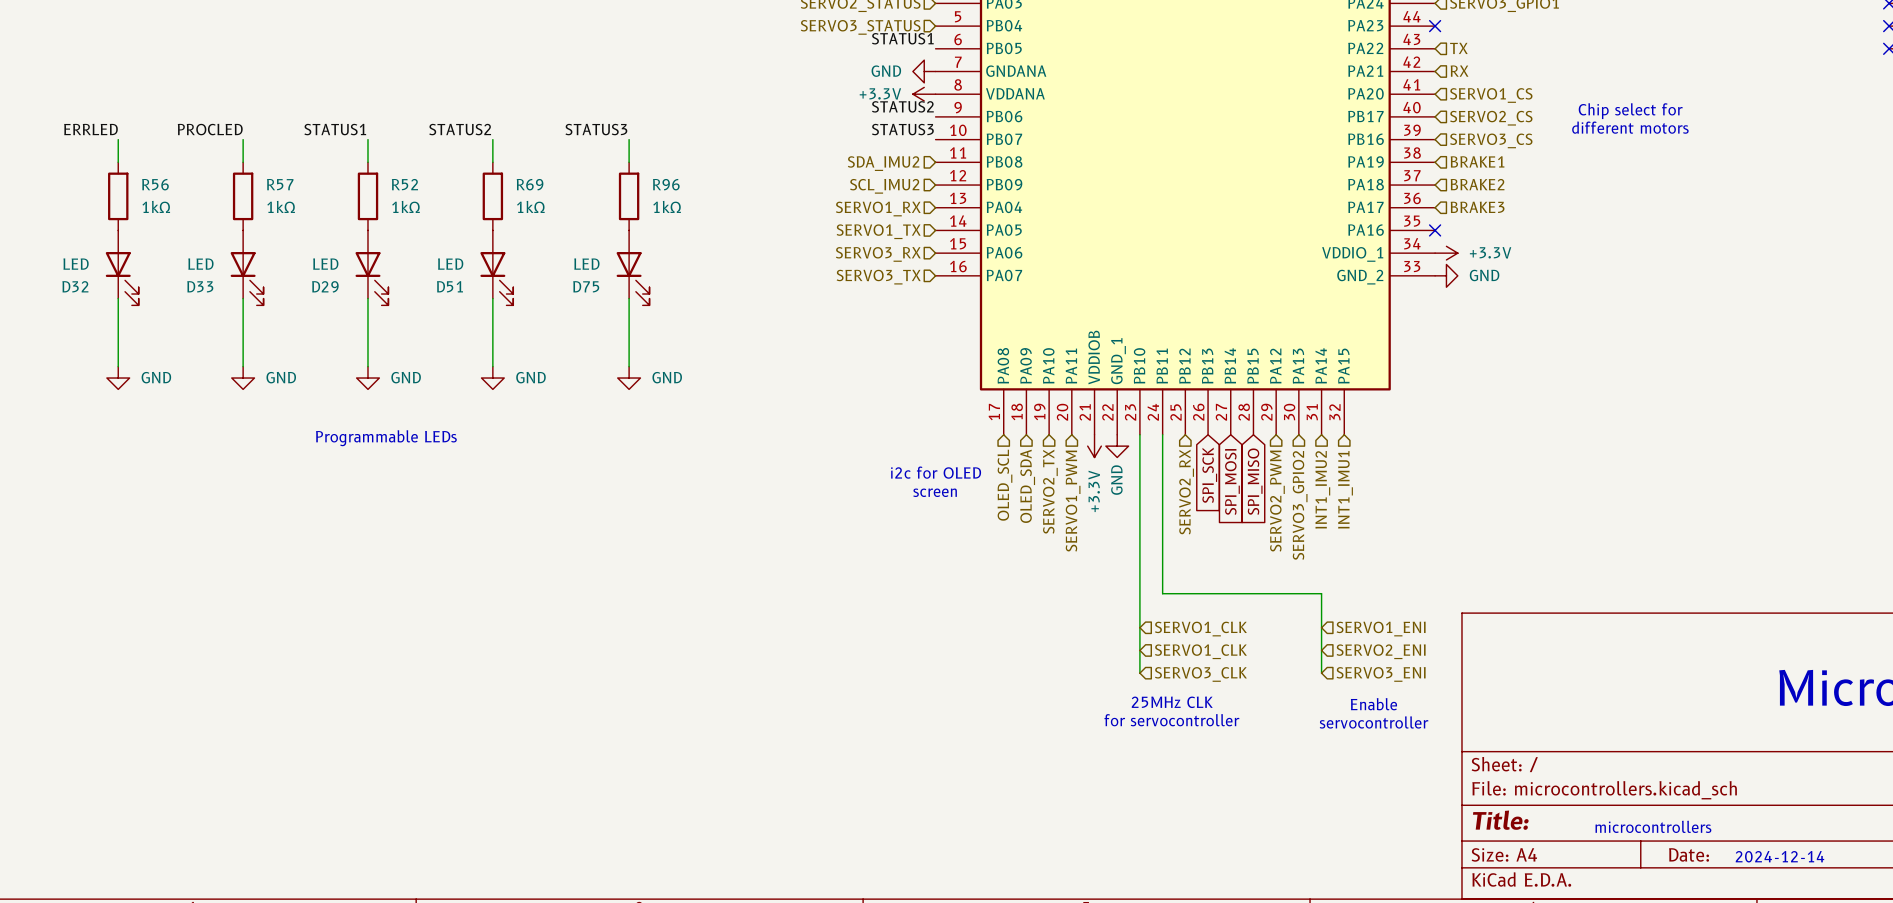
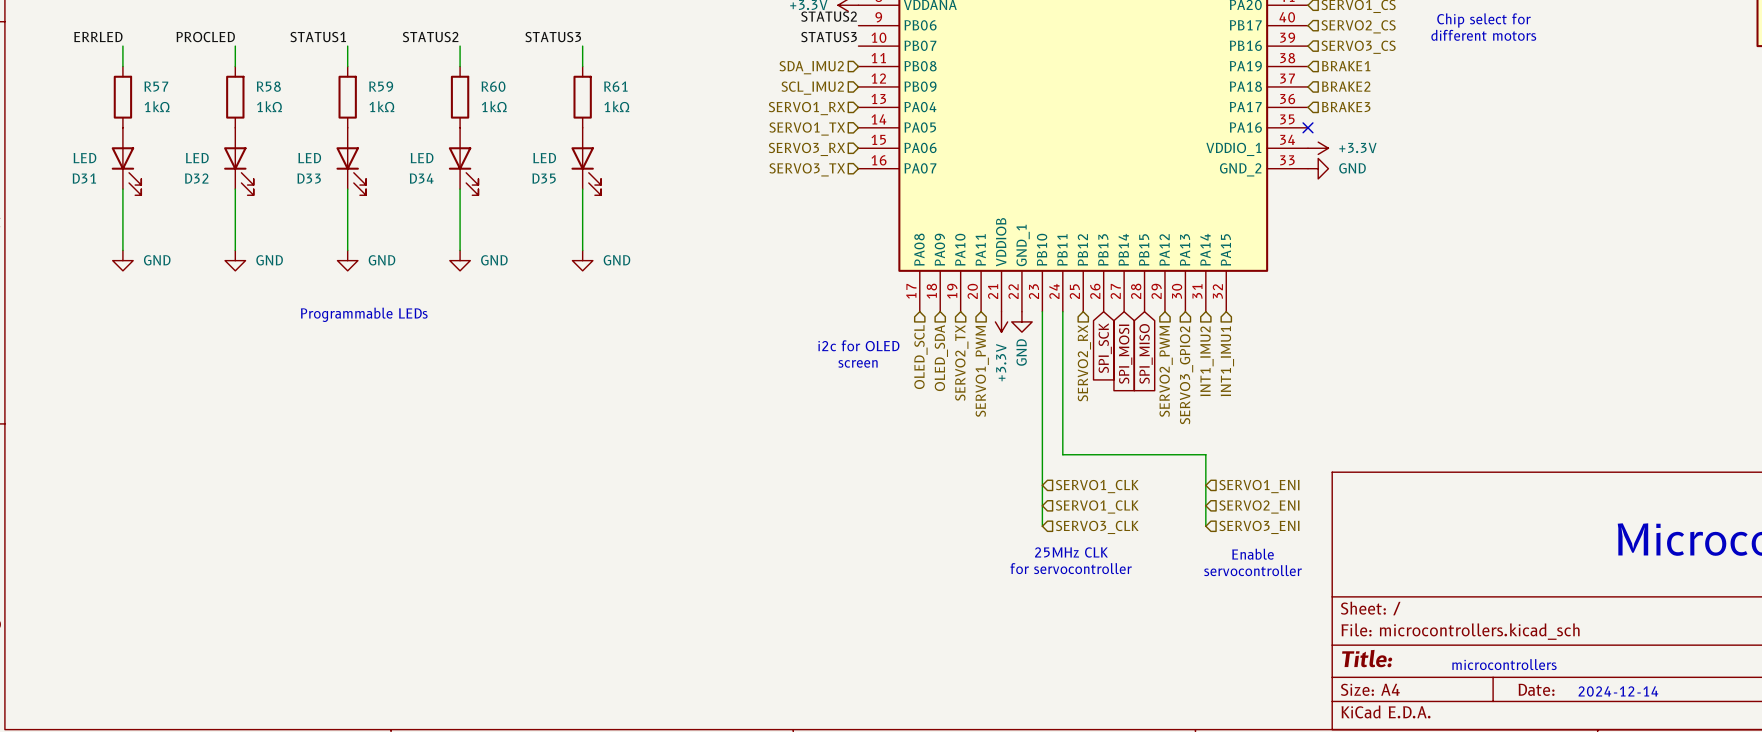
R56 name: R56 (155, 184) -> R57 (156, 86)
R57 name: R57 (280, 184) -> R58 (268, 86)
R52 name: R52 (404, 184) -> R59 (381, 86)
R69 name: R69 (530, 184) -> R60 (493, 86)
R96 name: R96 (666, 184) -> R61 (615, 86)
D32 name: D32 (75, 286) -> D31 (84, 178)
D33 name: D33 (200, 286) -> D32 (196, 178)
D29 name: D29 (325, 286) -> D33 (309, 178)
D51 name: D51 (450, 286) -> D34 (421, 178)
D75 name: D75 (586, 286) -> D35 (544, 178)

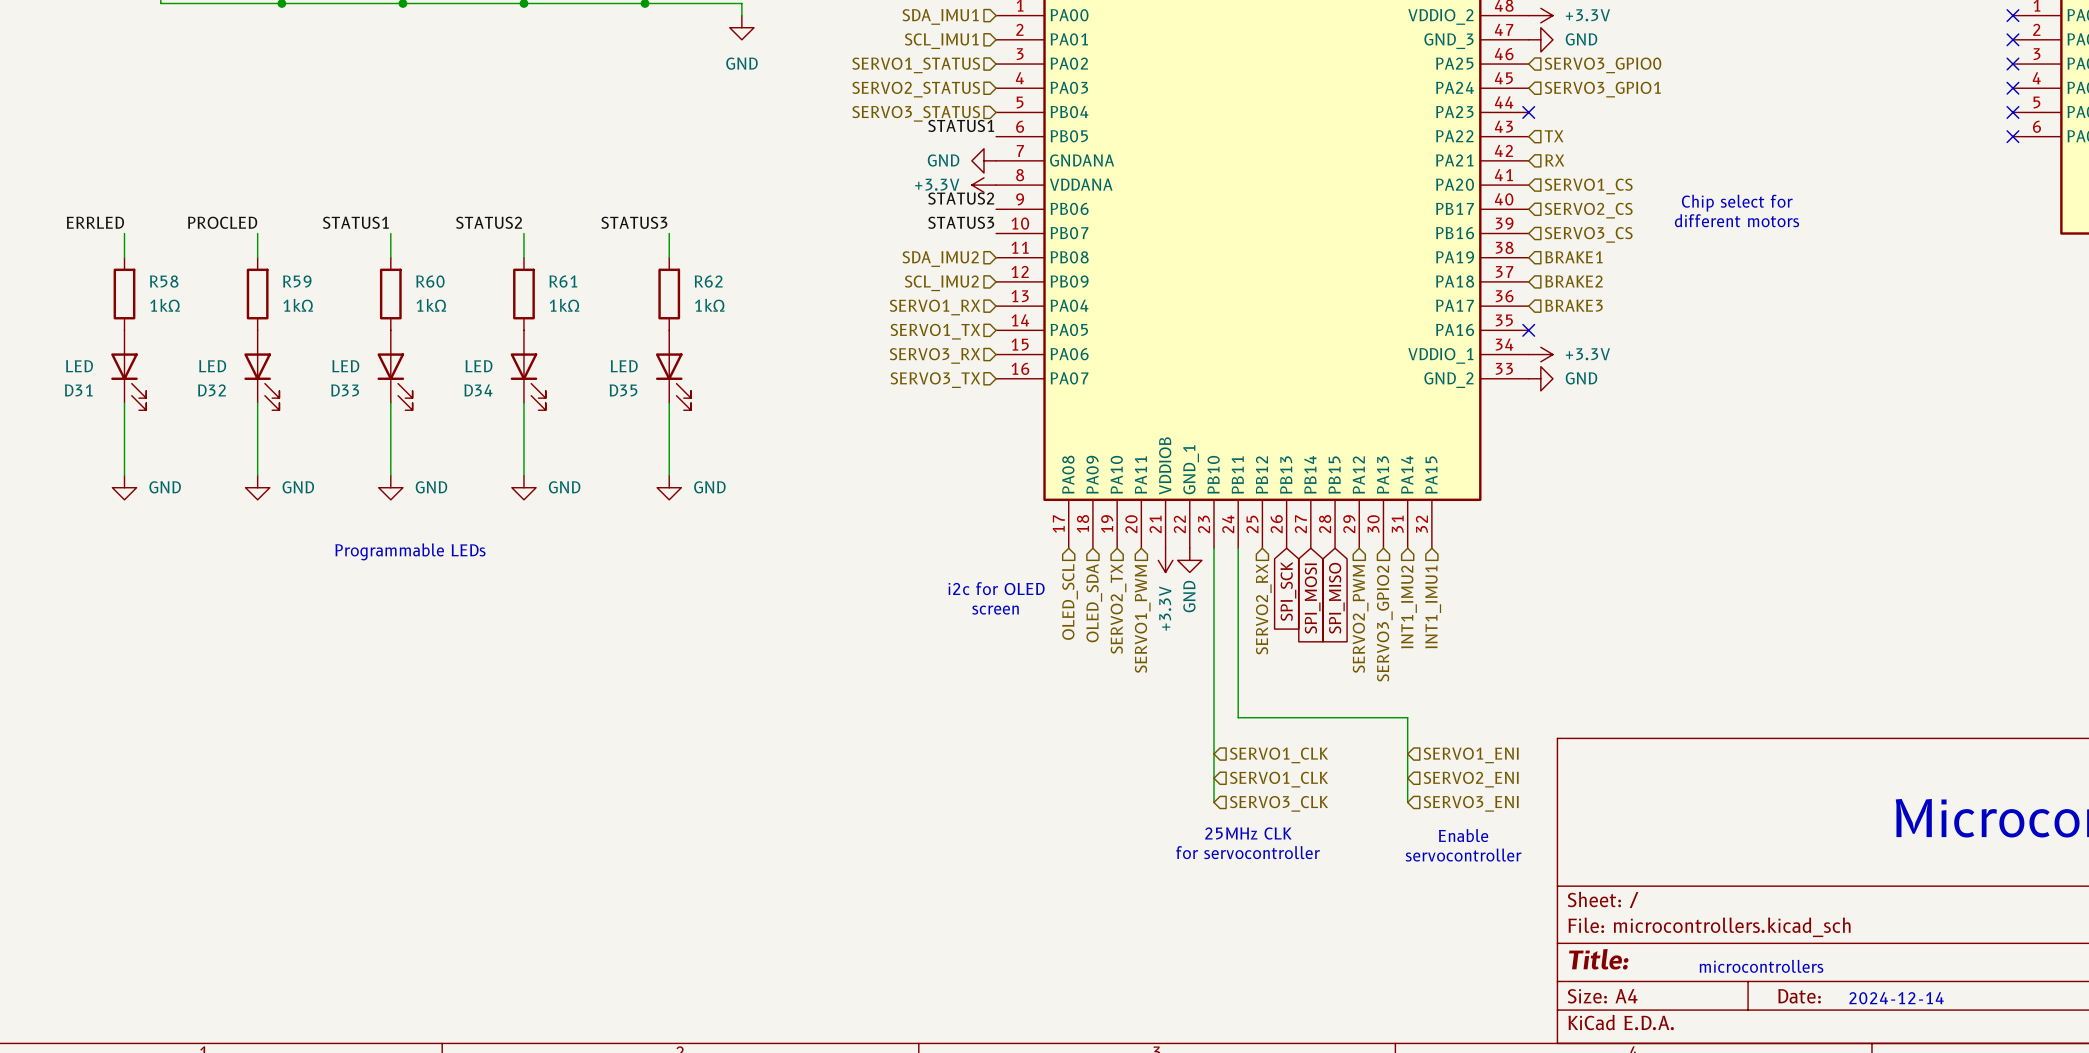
R57 name: R57 (156, 86) -> R58 (164, 281)
R58 name: R58 (268, 86) -> R59 (297, 281)
R59 name: R59 (381, 86) -> R60 (430, 281)
R60 name: R60 (493, 86) -> R61 (563, 281)
R61 name: R61 (615, 86) -> R62 (708, 281)

